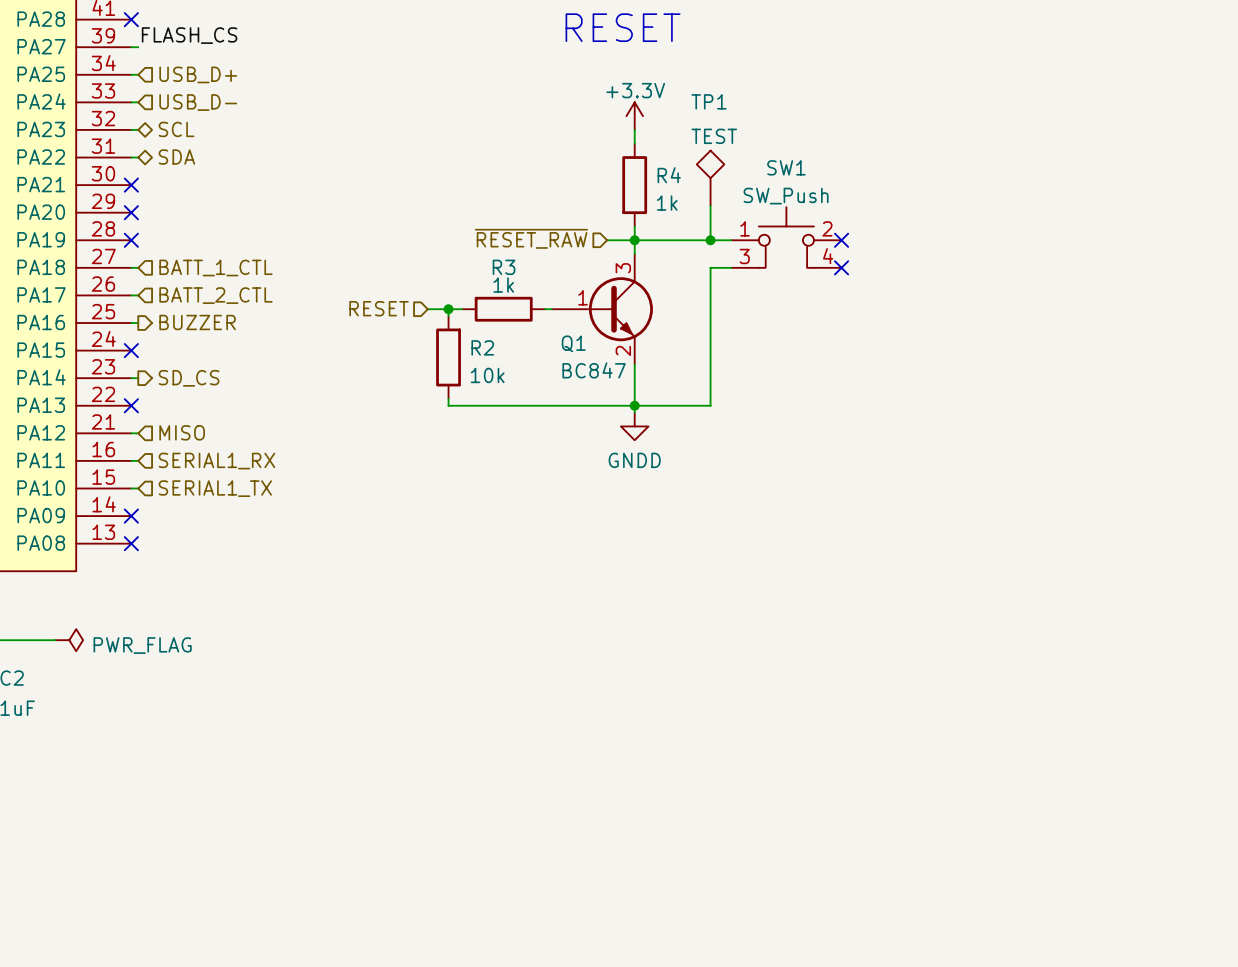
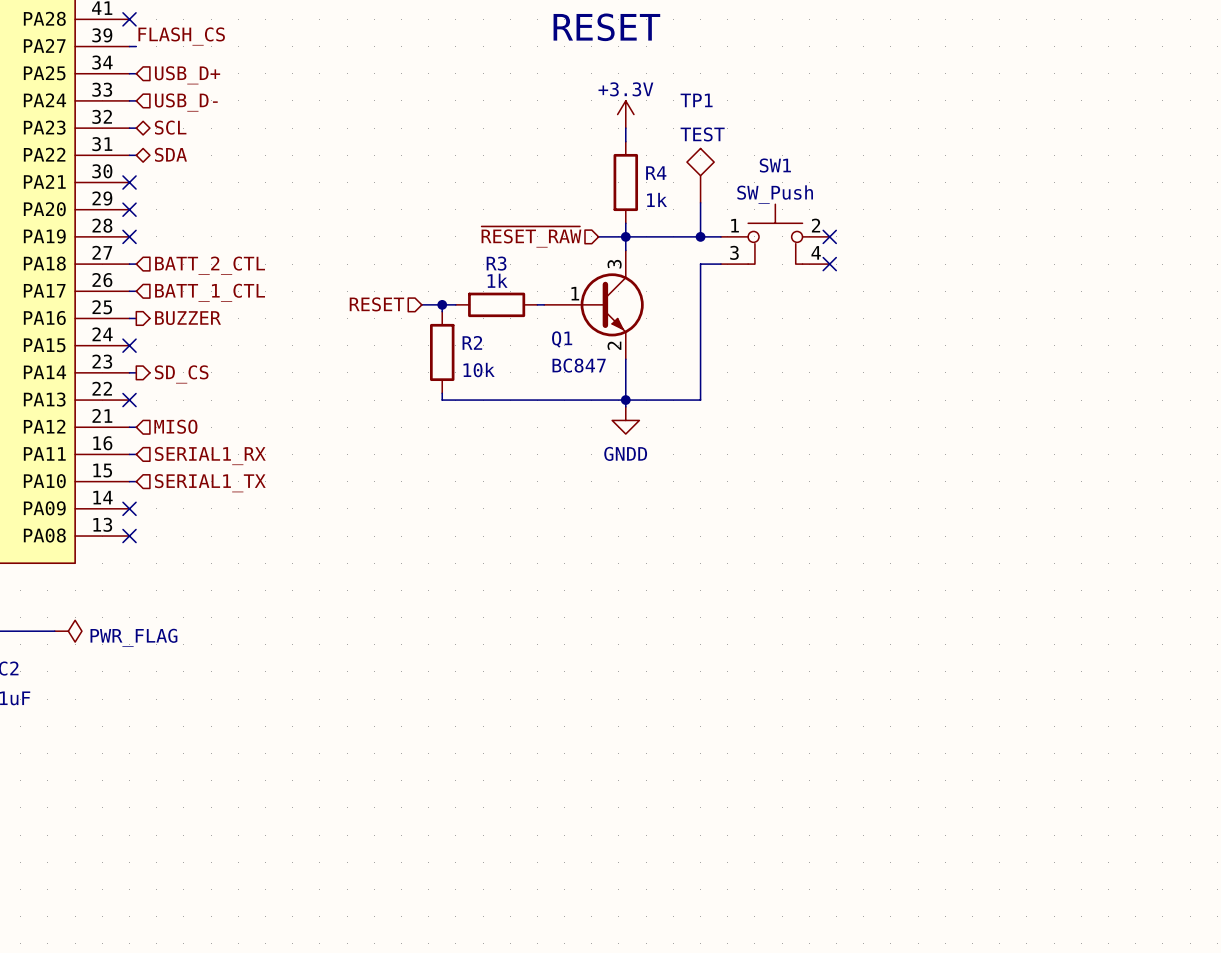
hierarchical label: BATT_1_CTL (215, 267) -> BATT_2_CTL (210, 265)
hierarchical label: BATT_2_CTL (215, 295) -> BATT_1_CTL (210, 292)

